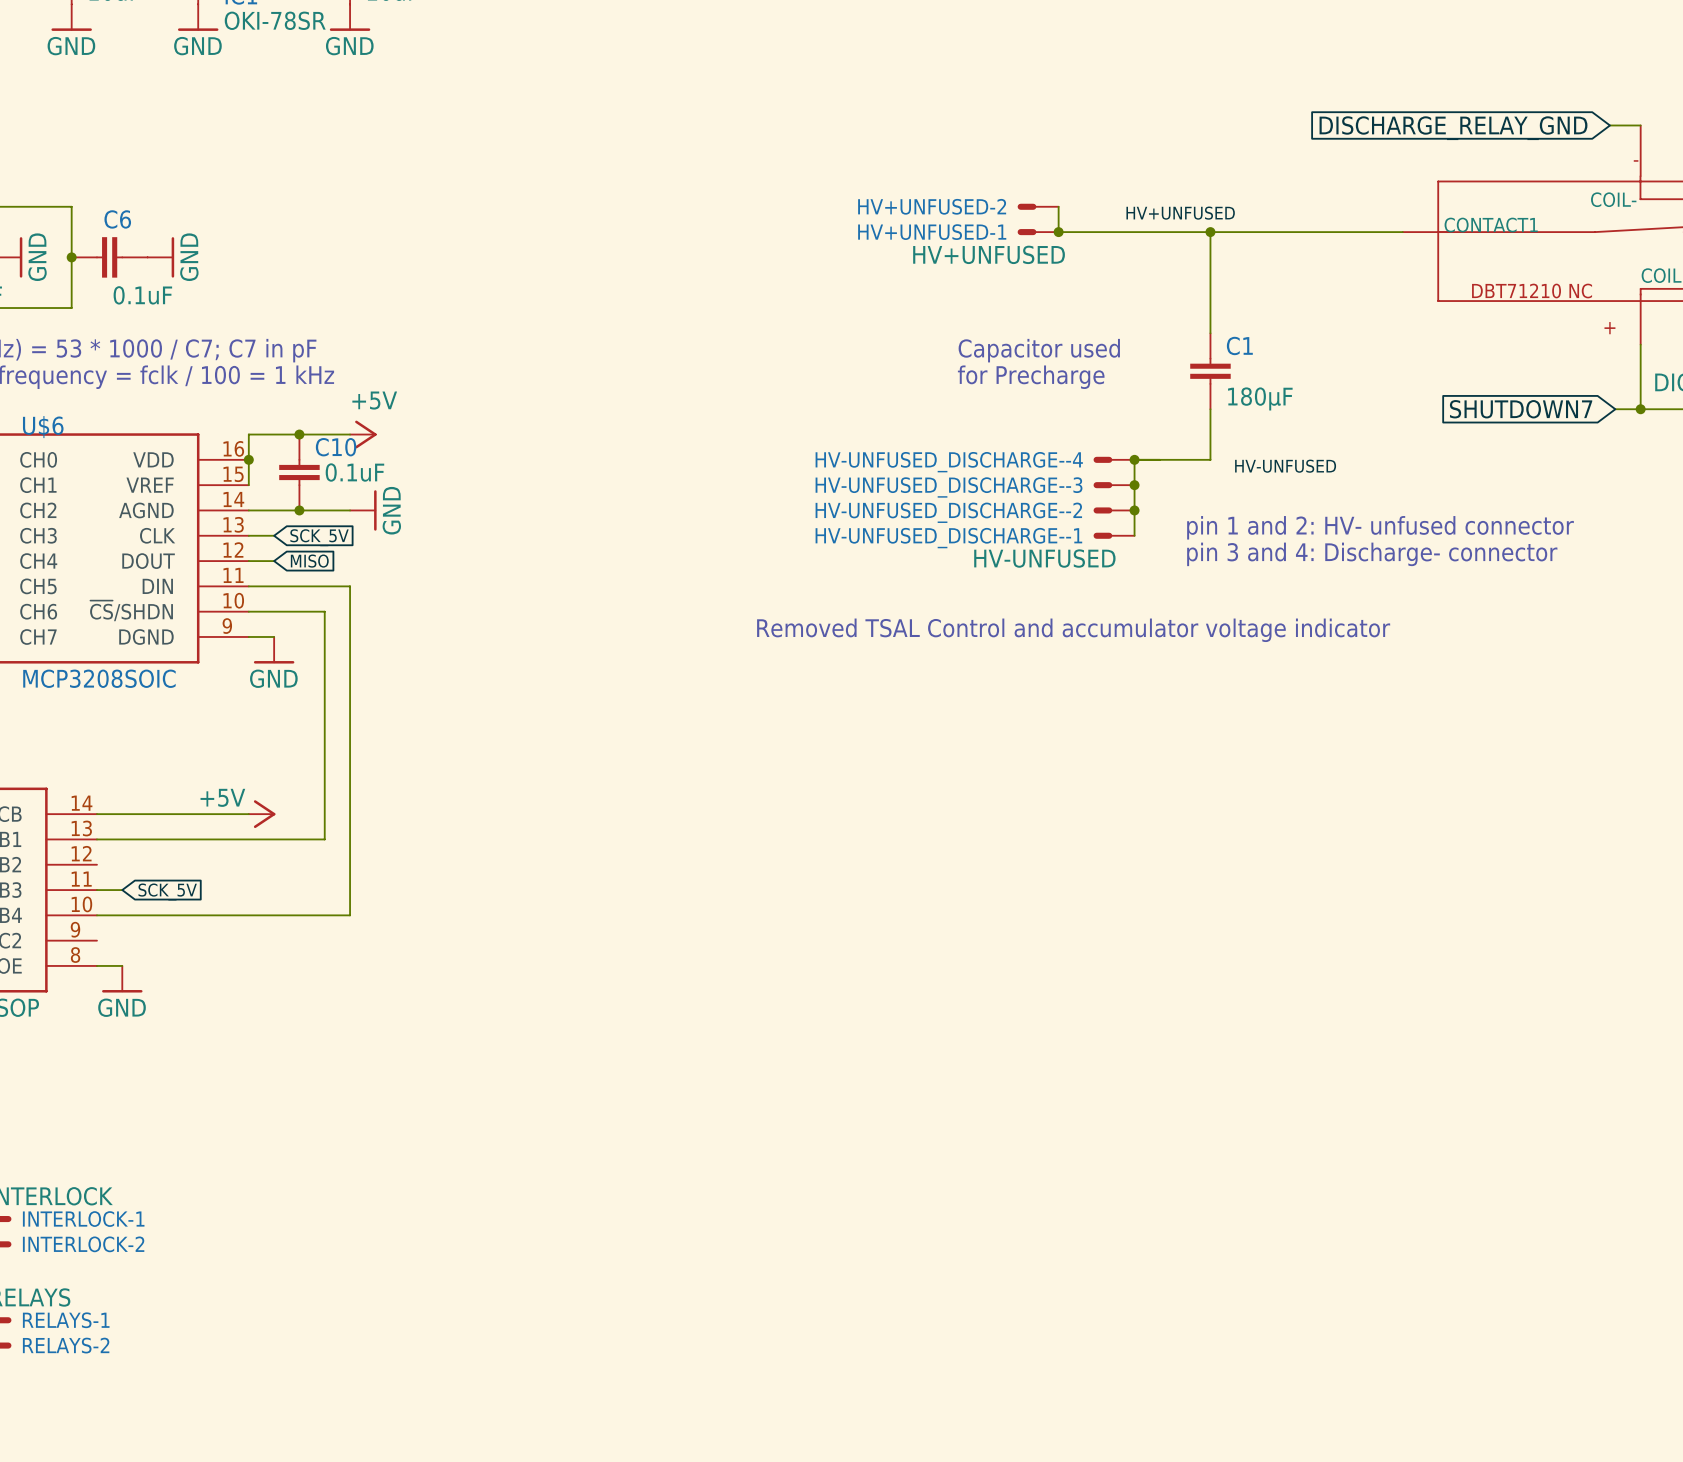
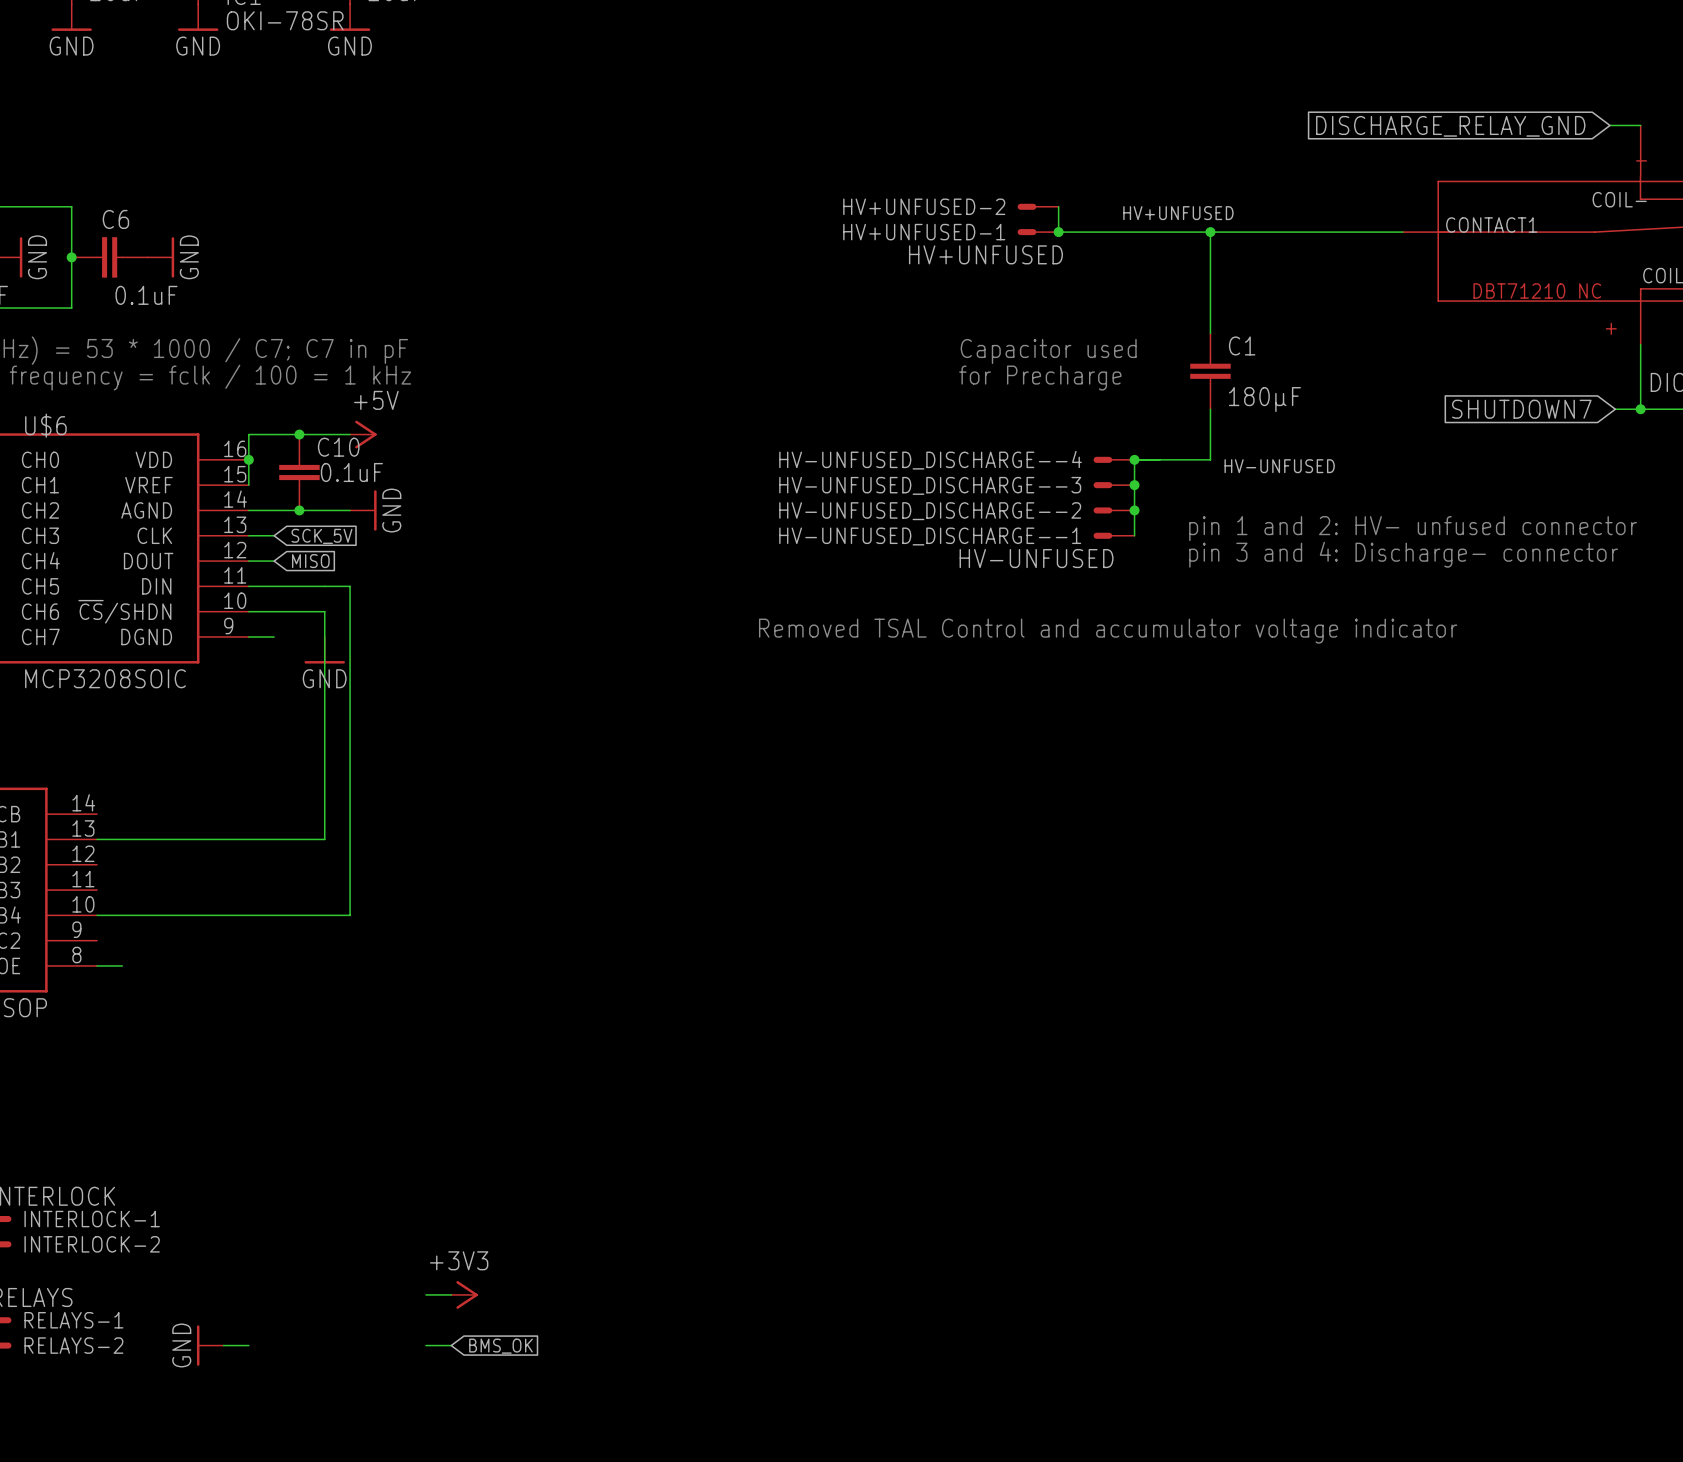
power symbol position: GND (274, 650) -> GND (324, 650)
wire: (96, 814) (248, 814) -> none
power symbol: +5V (262, 814) -> none
wire: (96, 890) (122, 890) -> none
global label: SCK_5V (167, 891) -> none
power symbol: GND (122, 979) -> none
wire: none -> (425, 1294) (451, 1294)
power symbol: none -> +3V3 (464, 1294)
power symbol: none -> GND (210, 1345)
wire: none -> (223, 1345) (248, 1345)
wire: none -> (425, 1345) (451, 1345)
global label: none -> BMS_OK (501, 1346)

